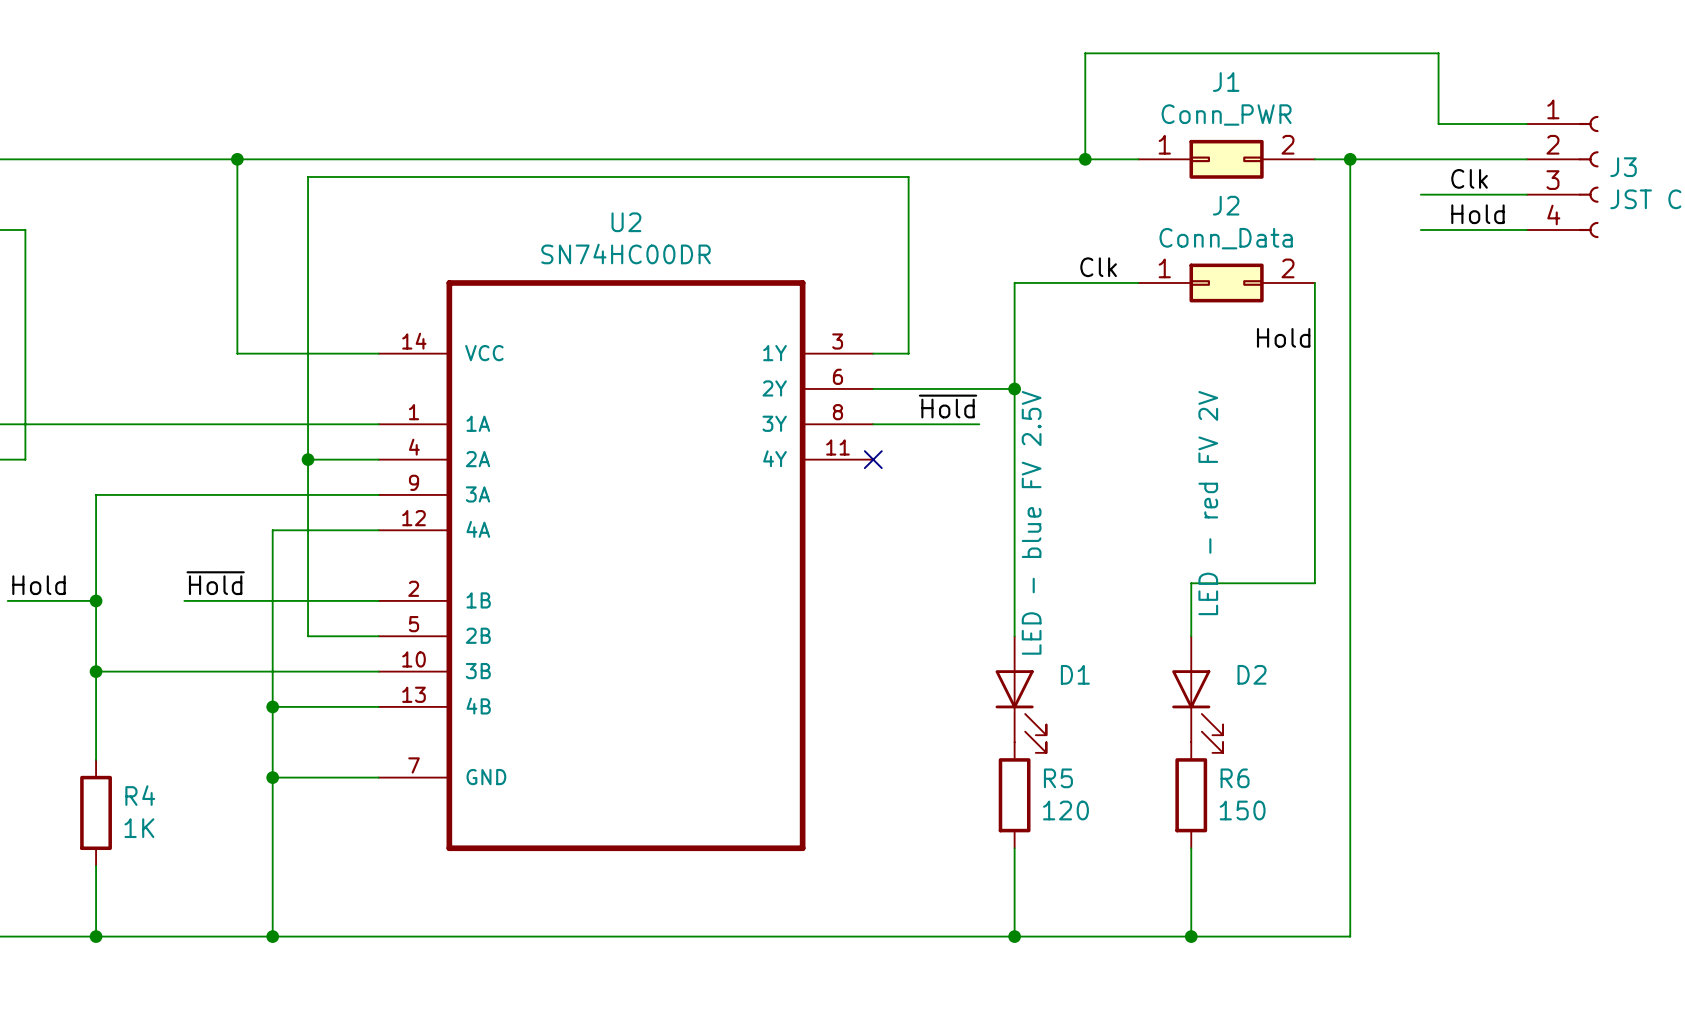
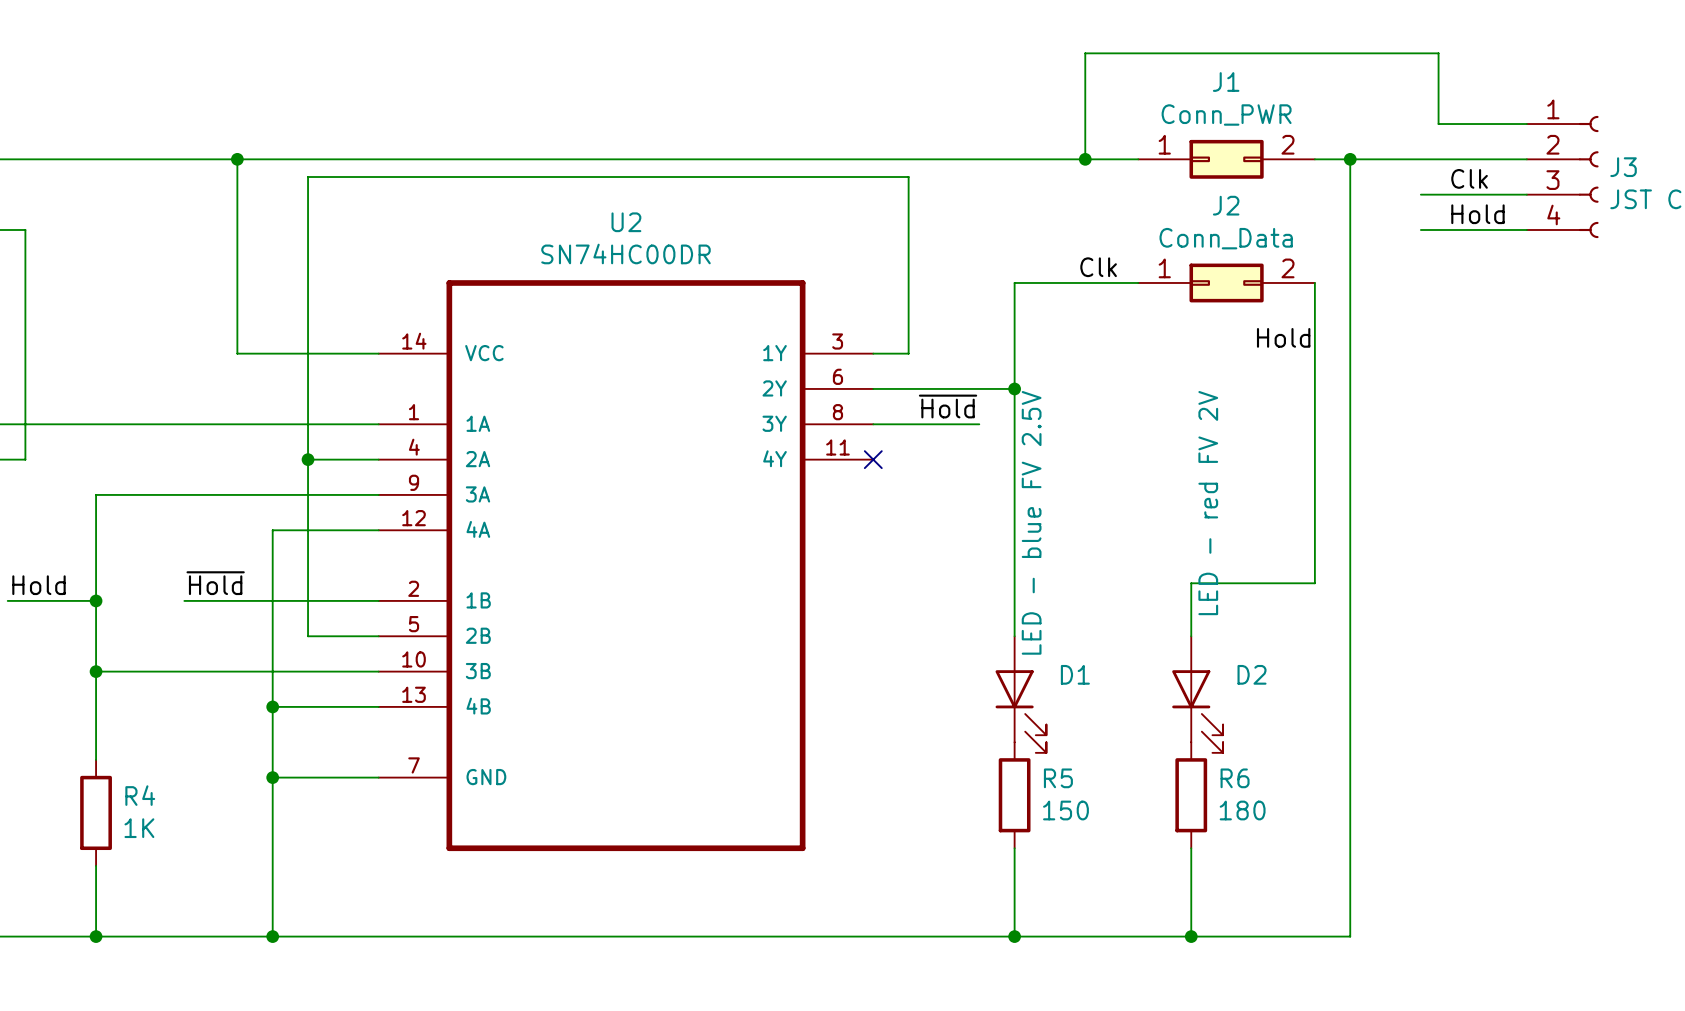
R5 value: 120 (1065, 810) -> 150 (1065, 810)
R6 value: 150 (1242, 810) -> 180 (1242, 810)

